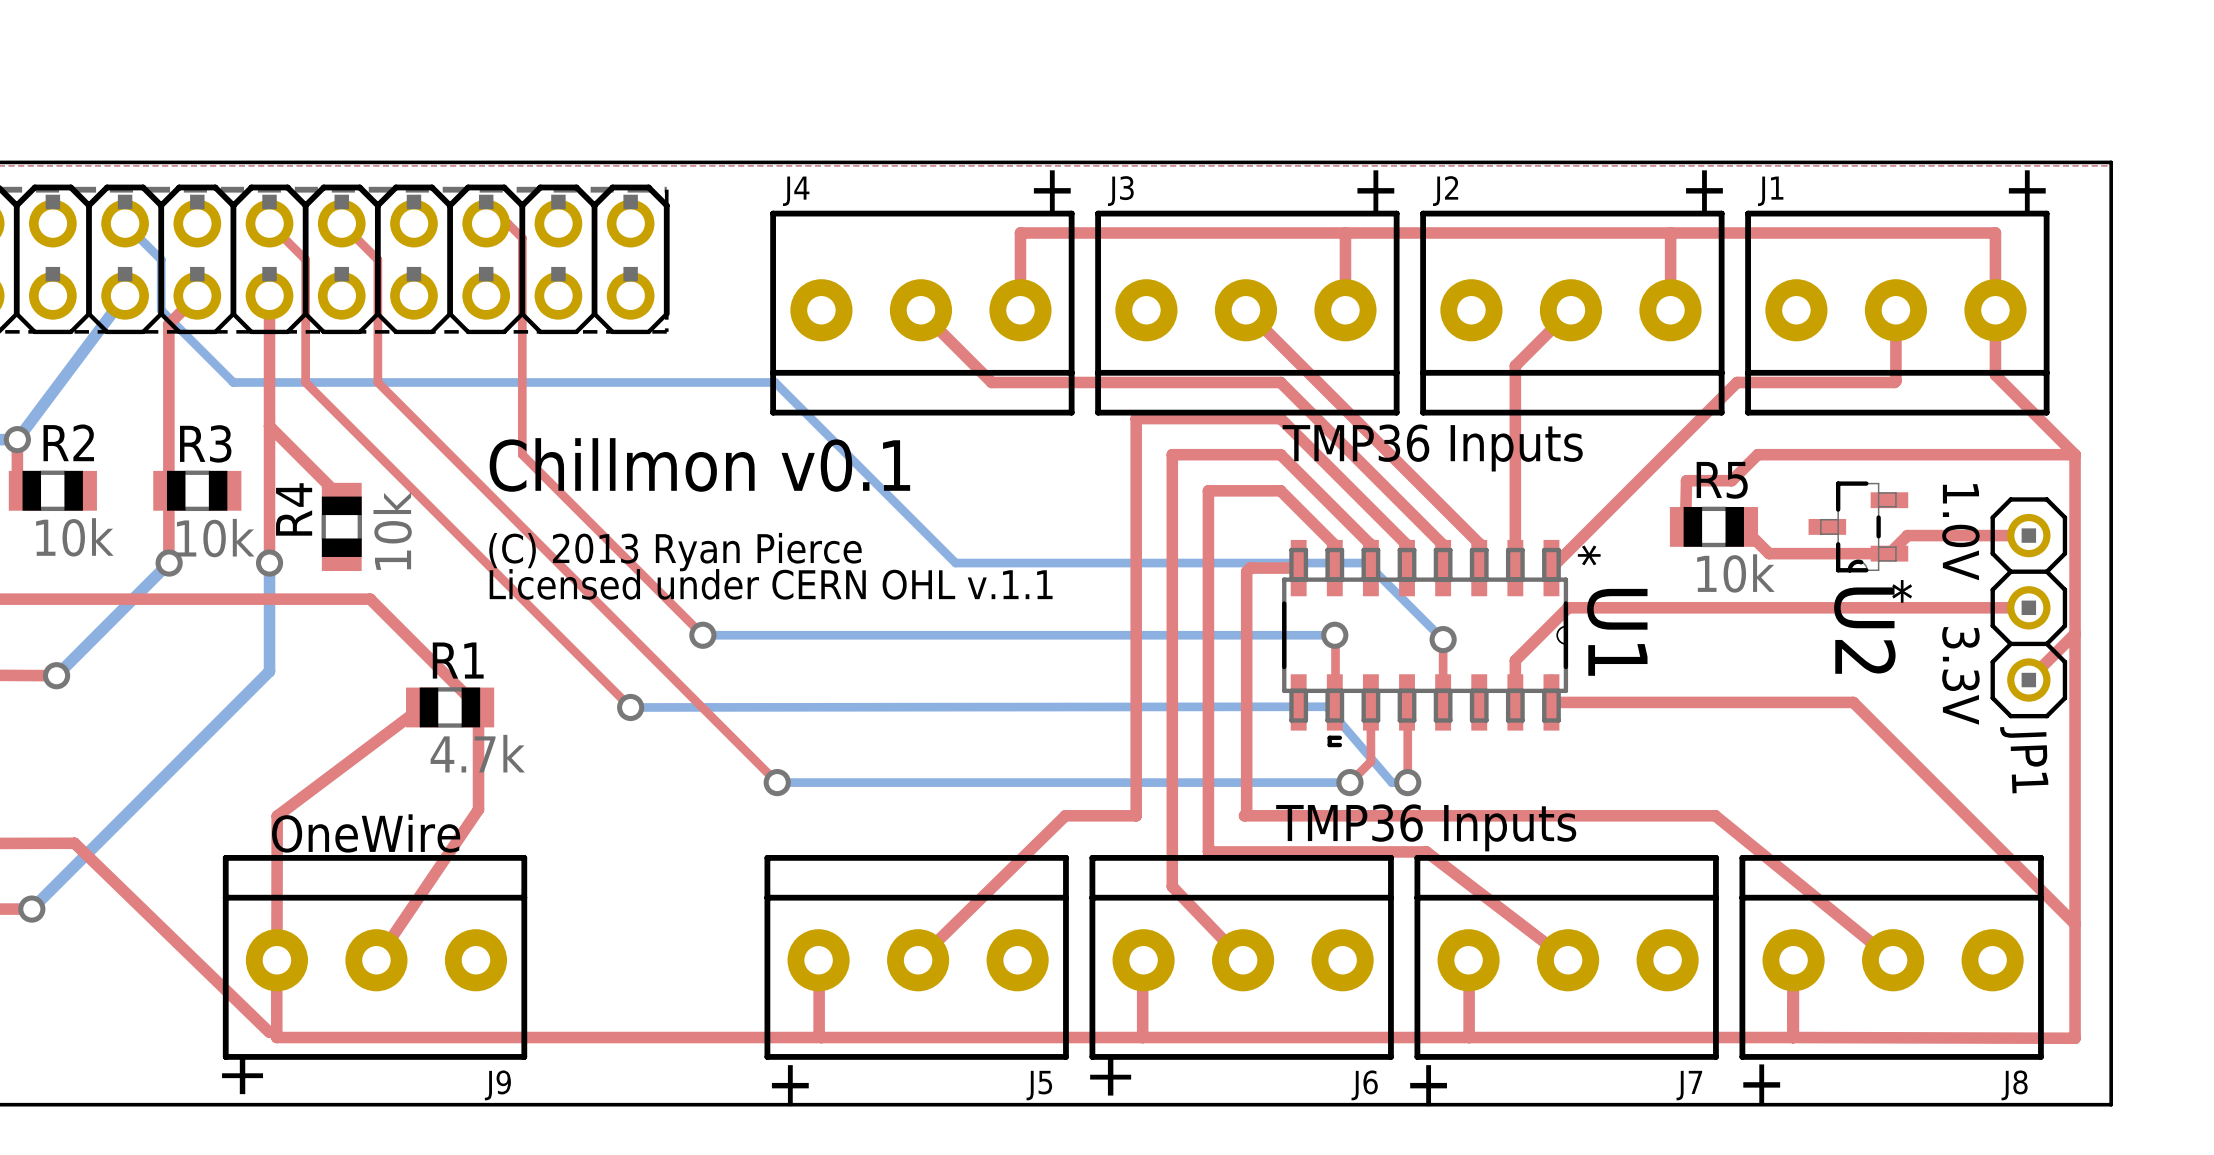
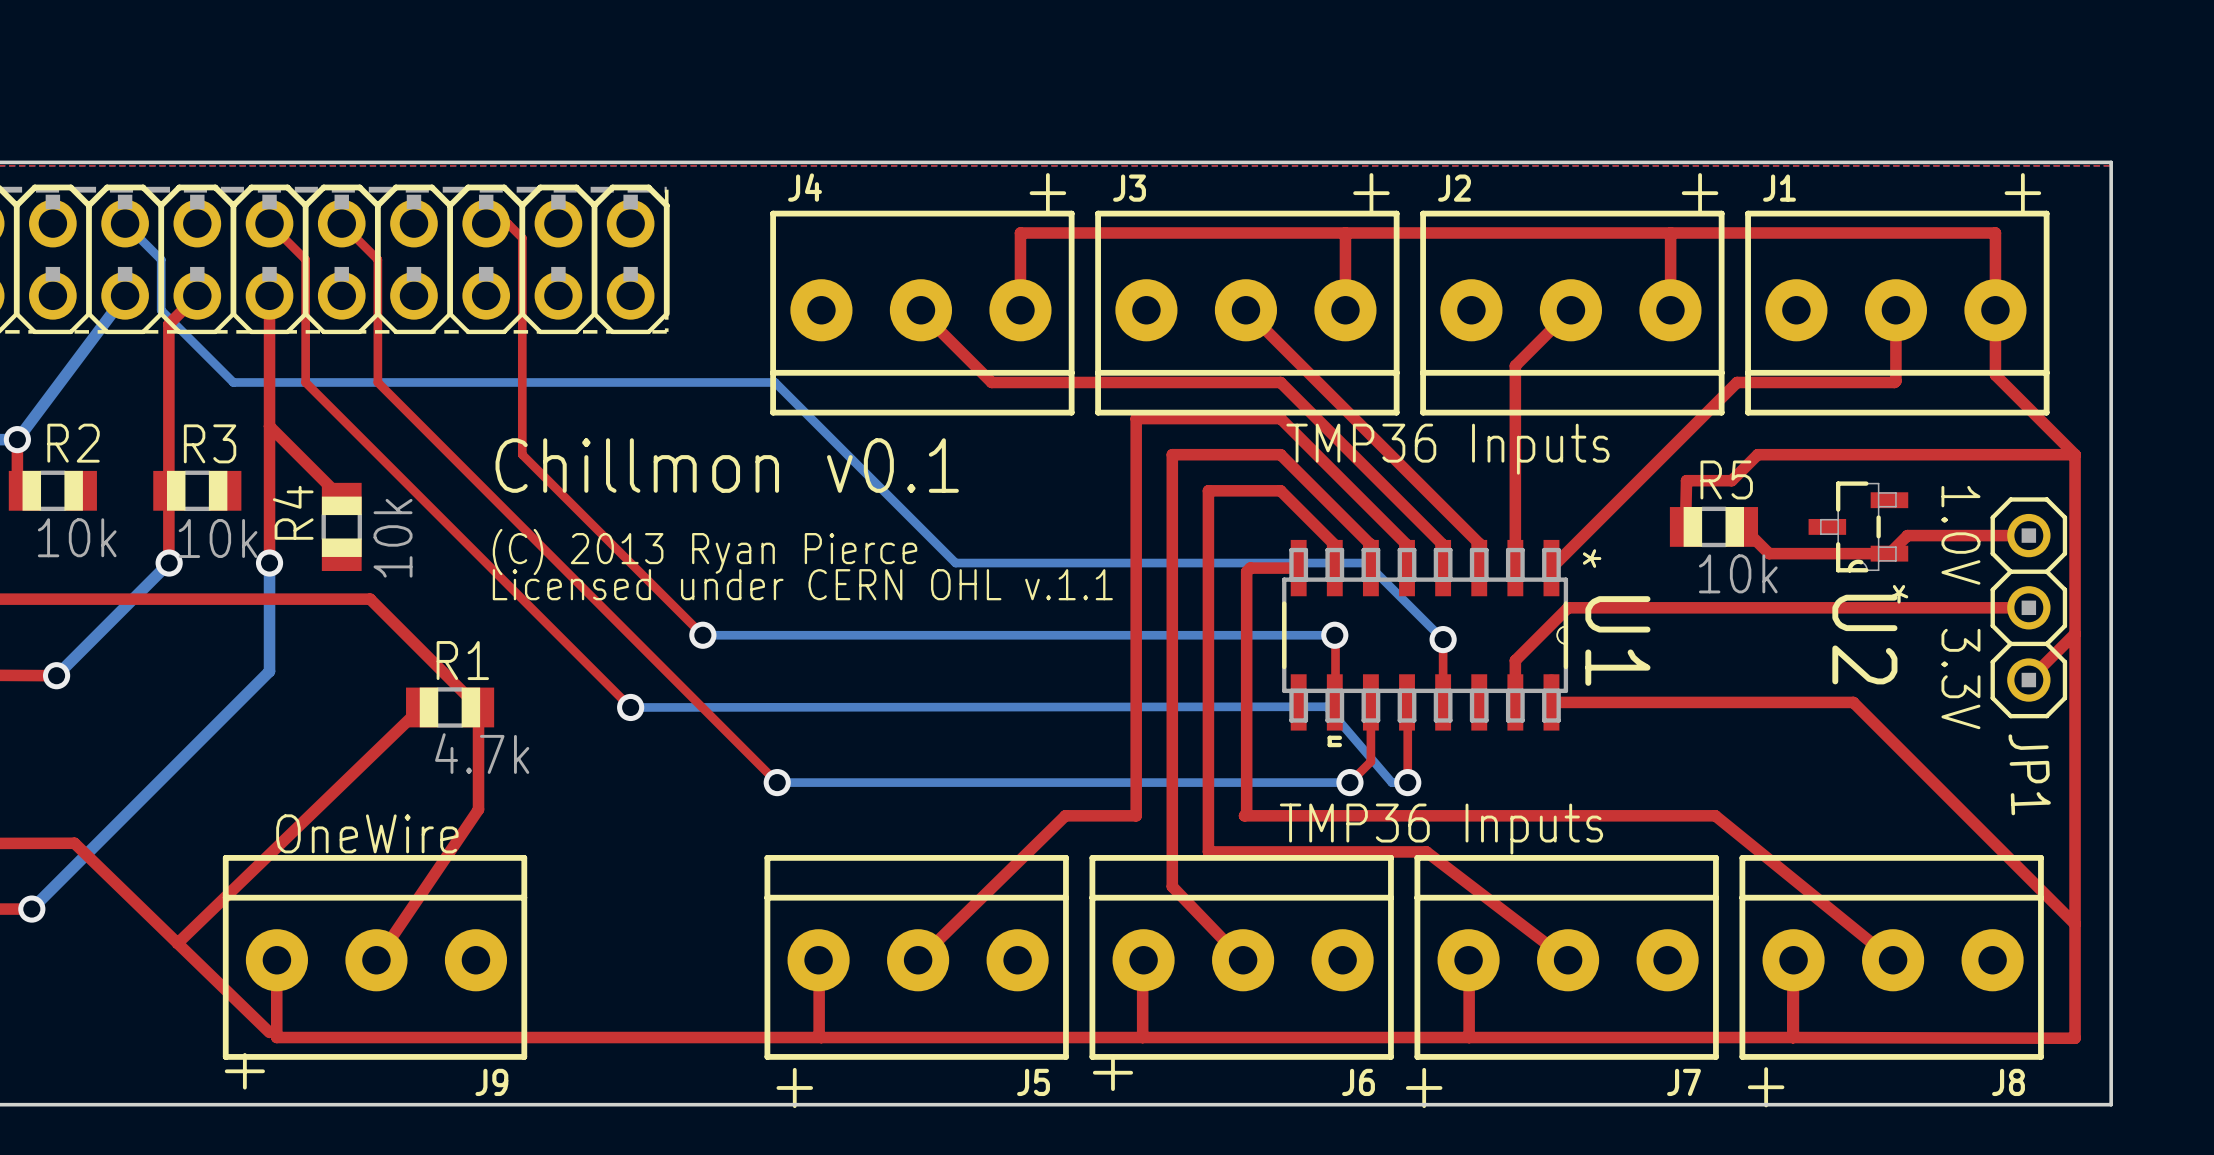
top track: (421, 707) (277, 816) (276, 960) -> (421, 707) (177, 943)

